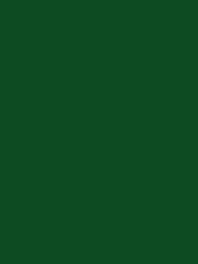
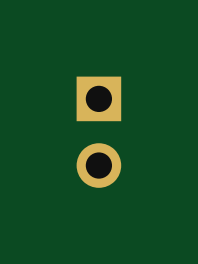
part: none -> (98, 132)

